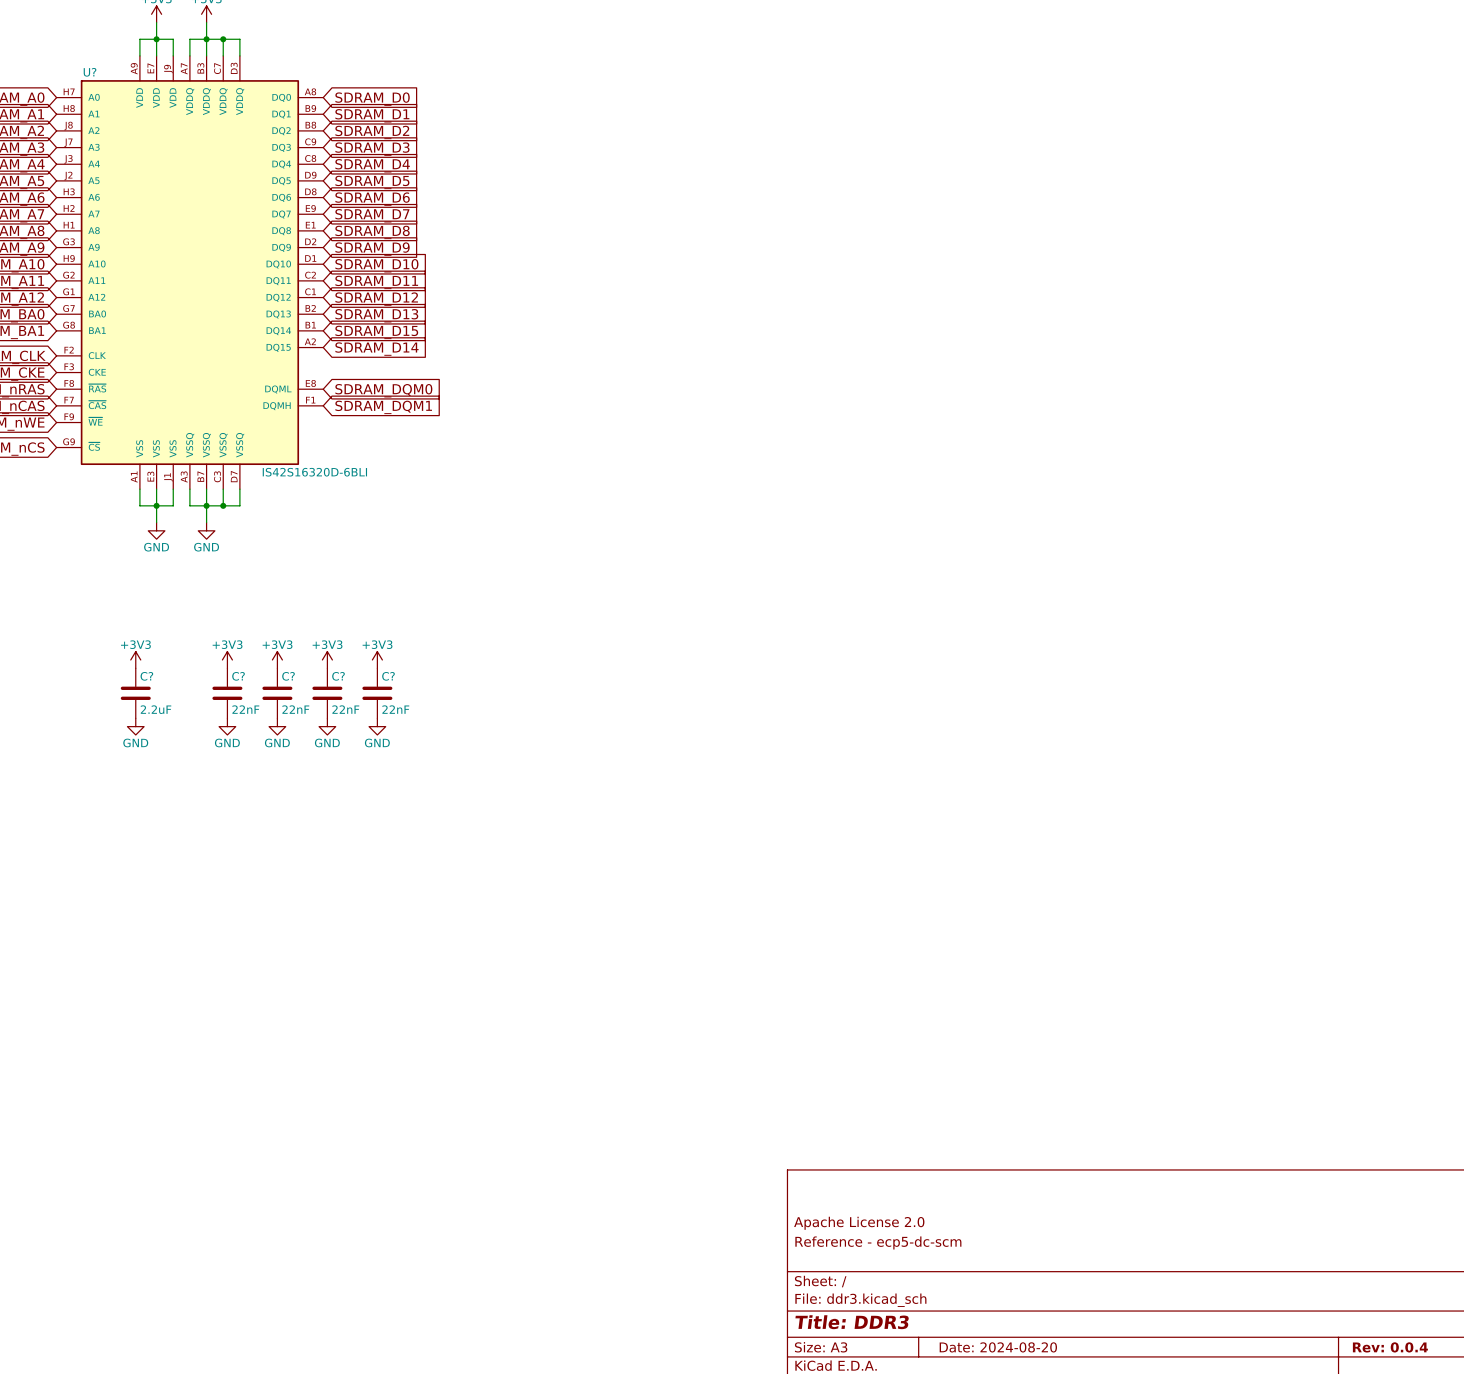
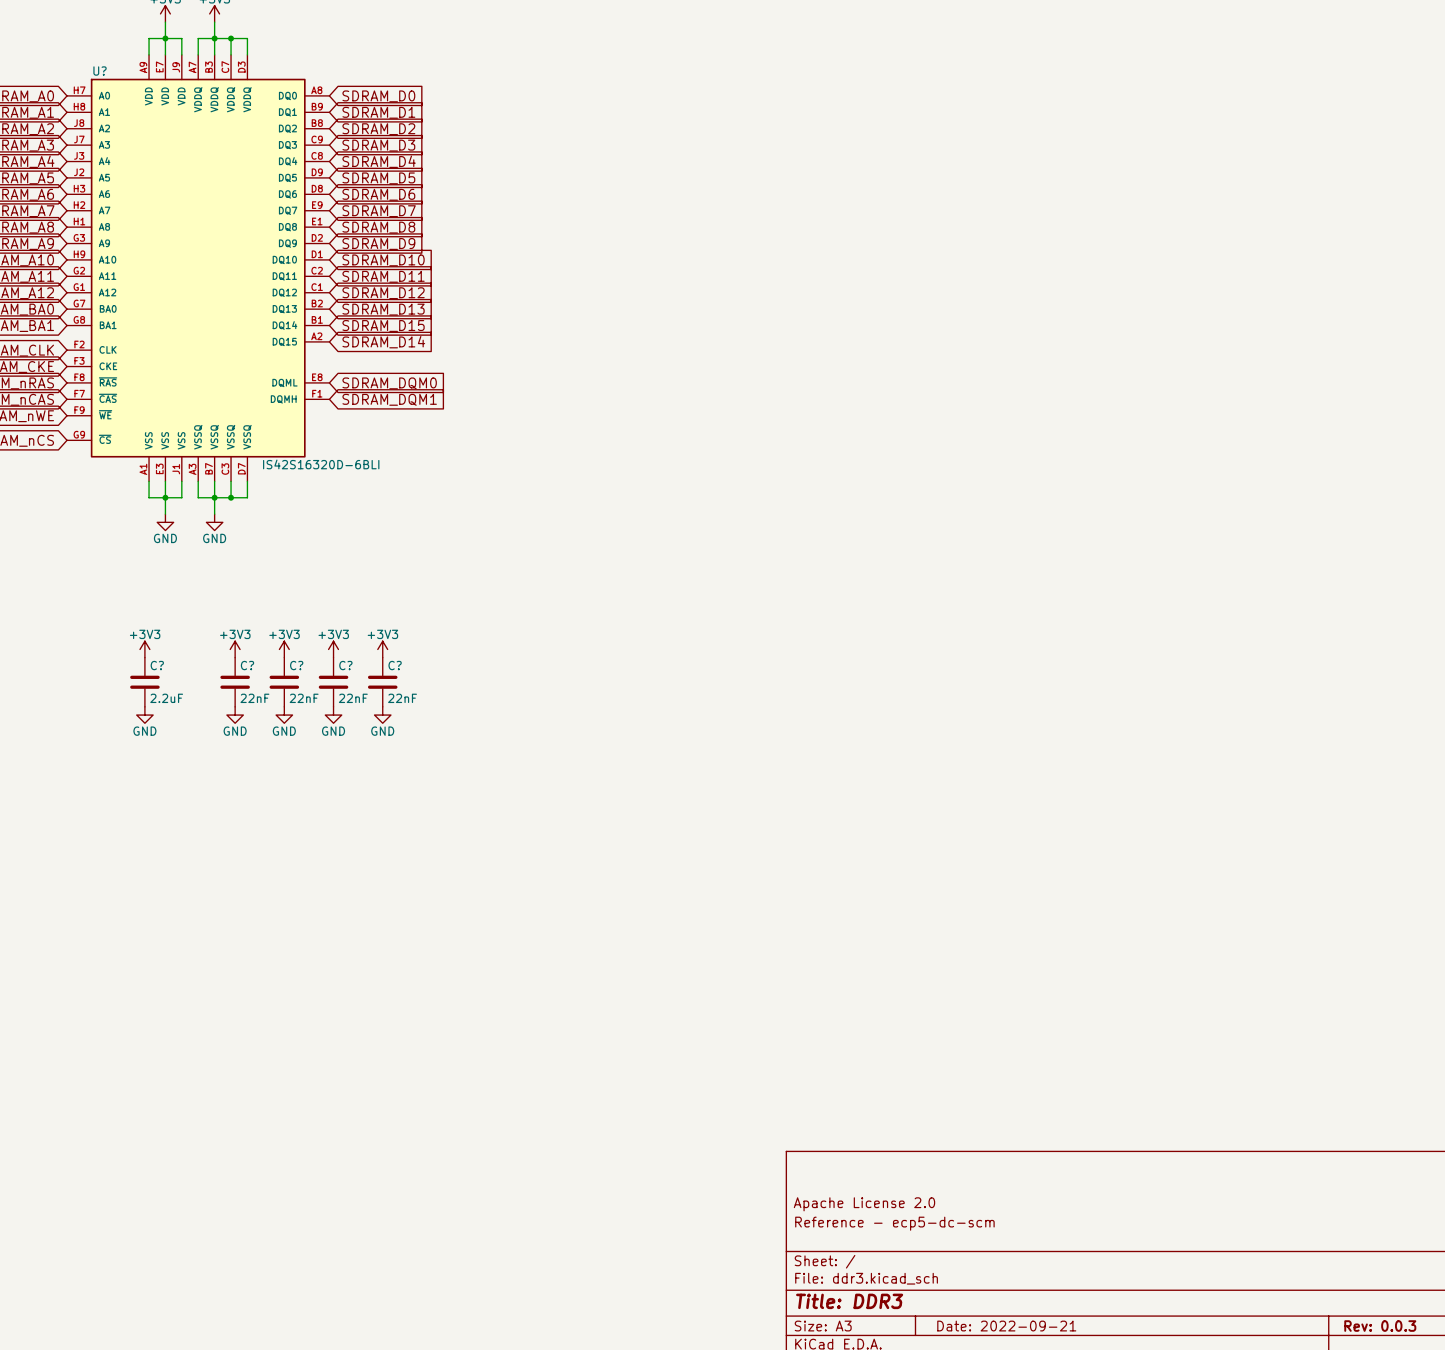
title block: Date: 2024-08-20 (998, 1347) -> Date: 2022-09-21 (1006, 1326)
title block: Rev: 0.0.4 (1390, 1347) -> Rev: 0.0.3 (1380, 1326)

